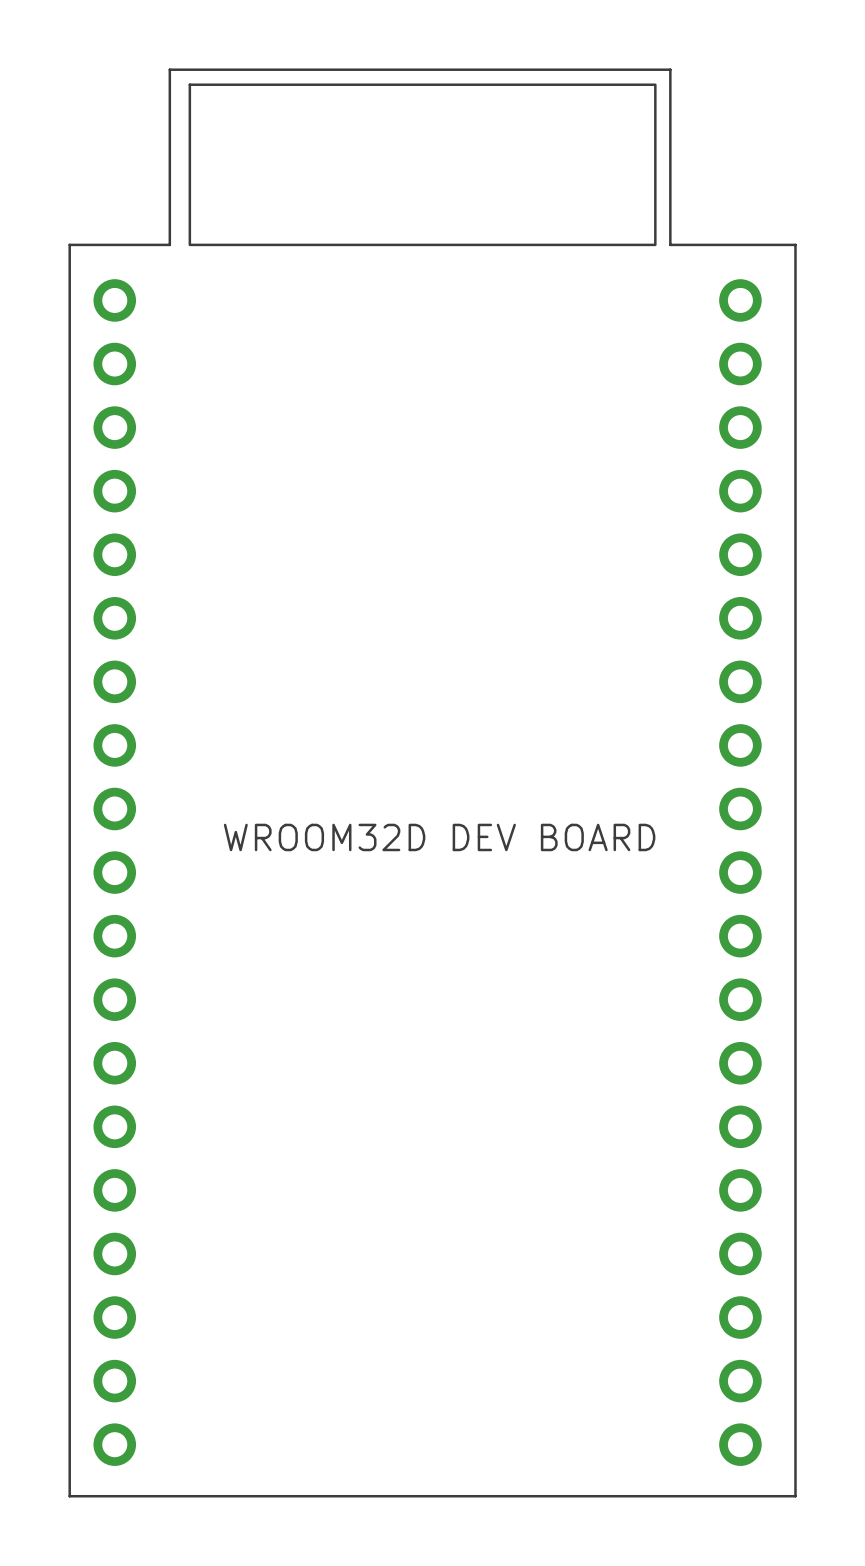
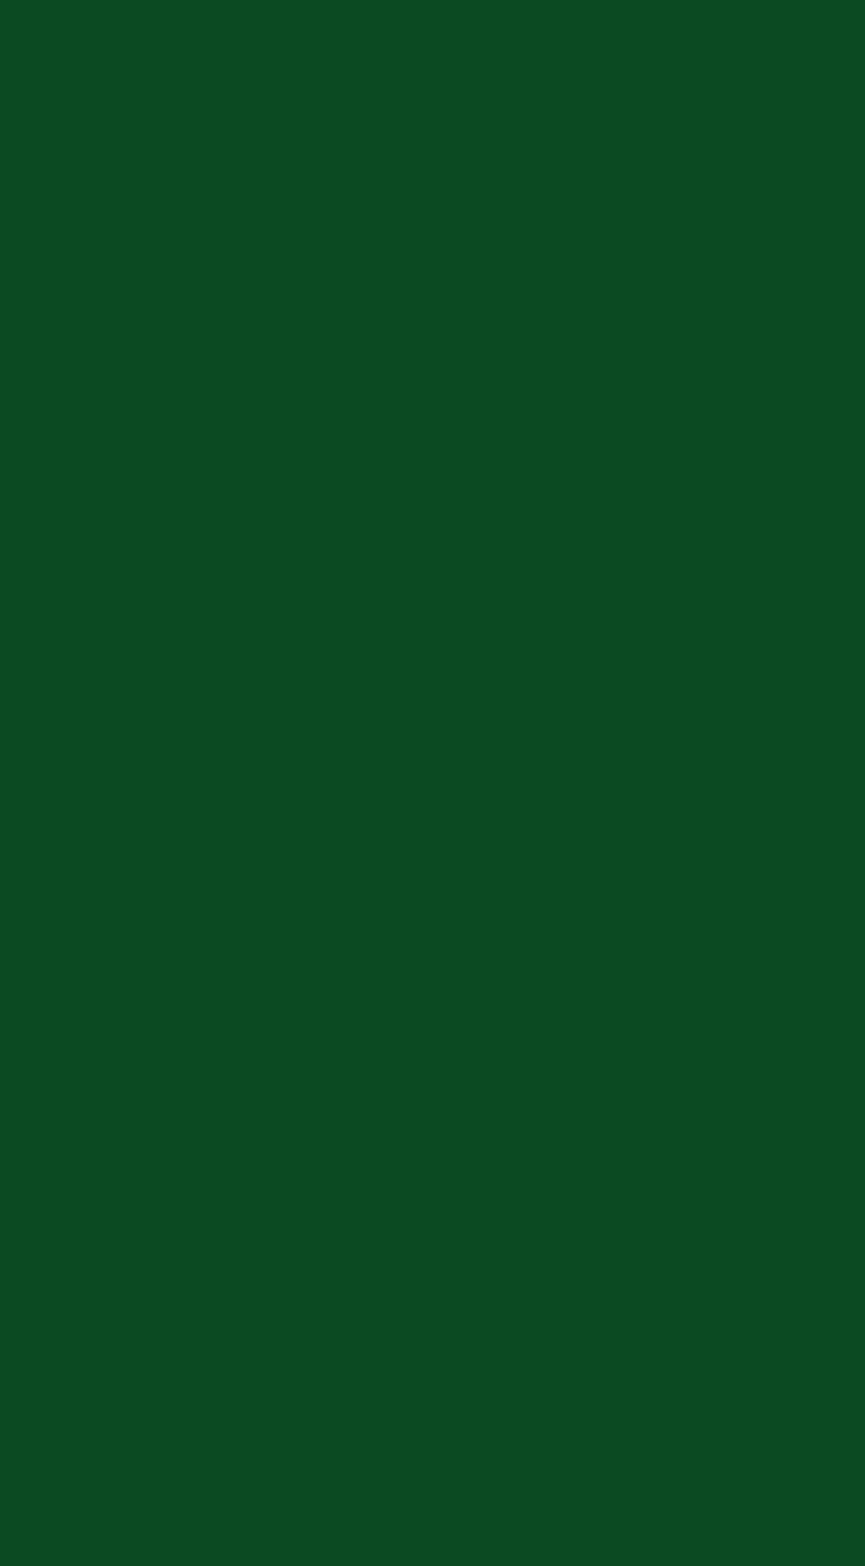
part: (432, 782) -> none

